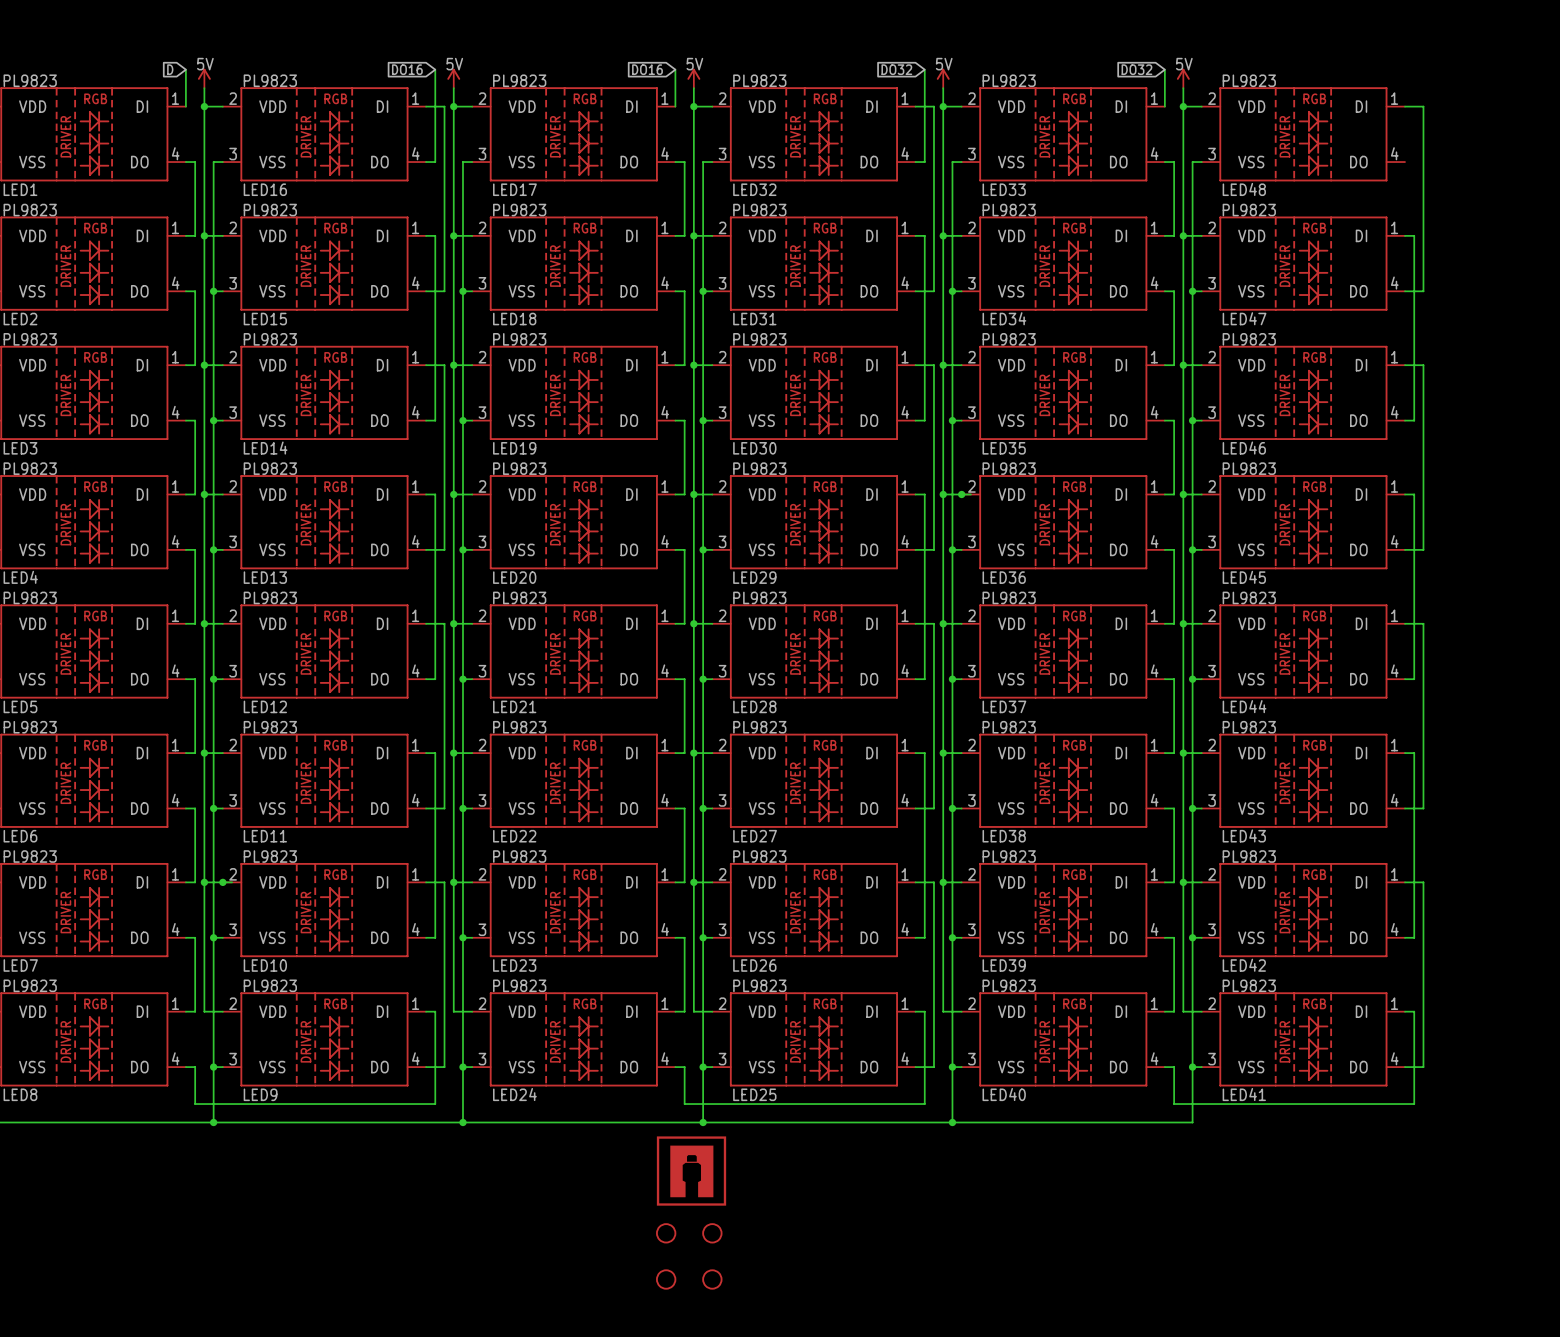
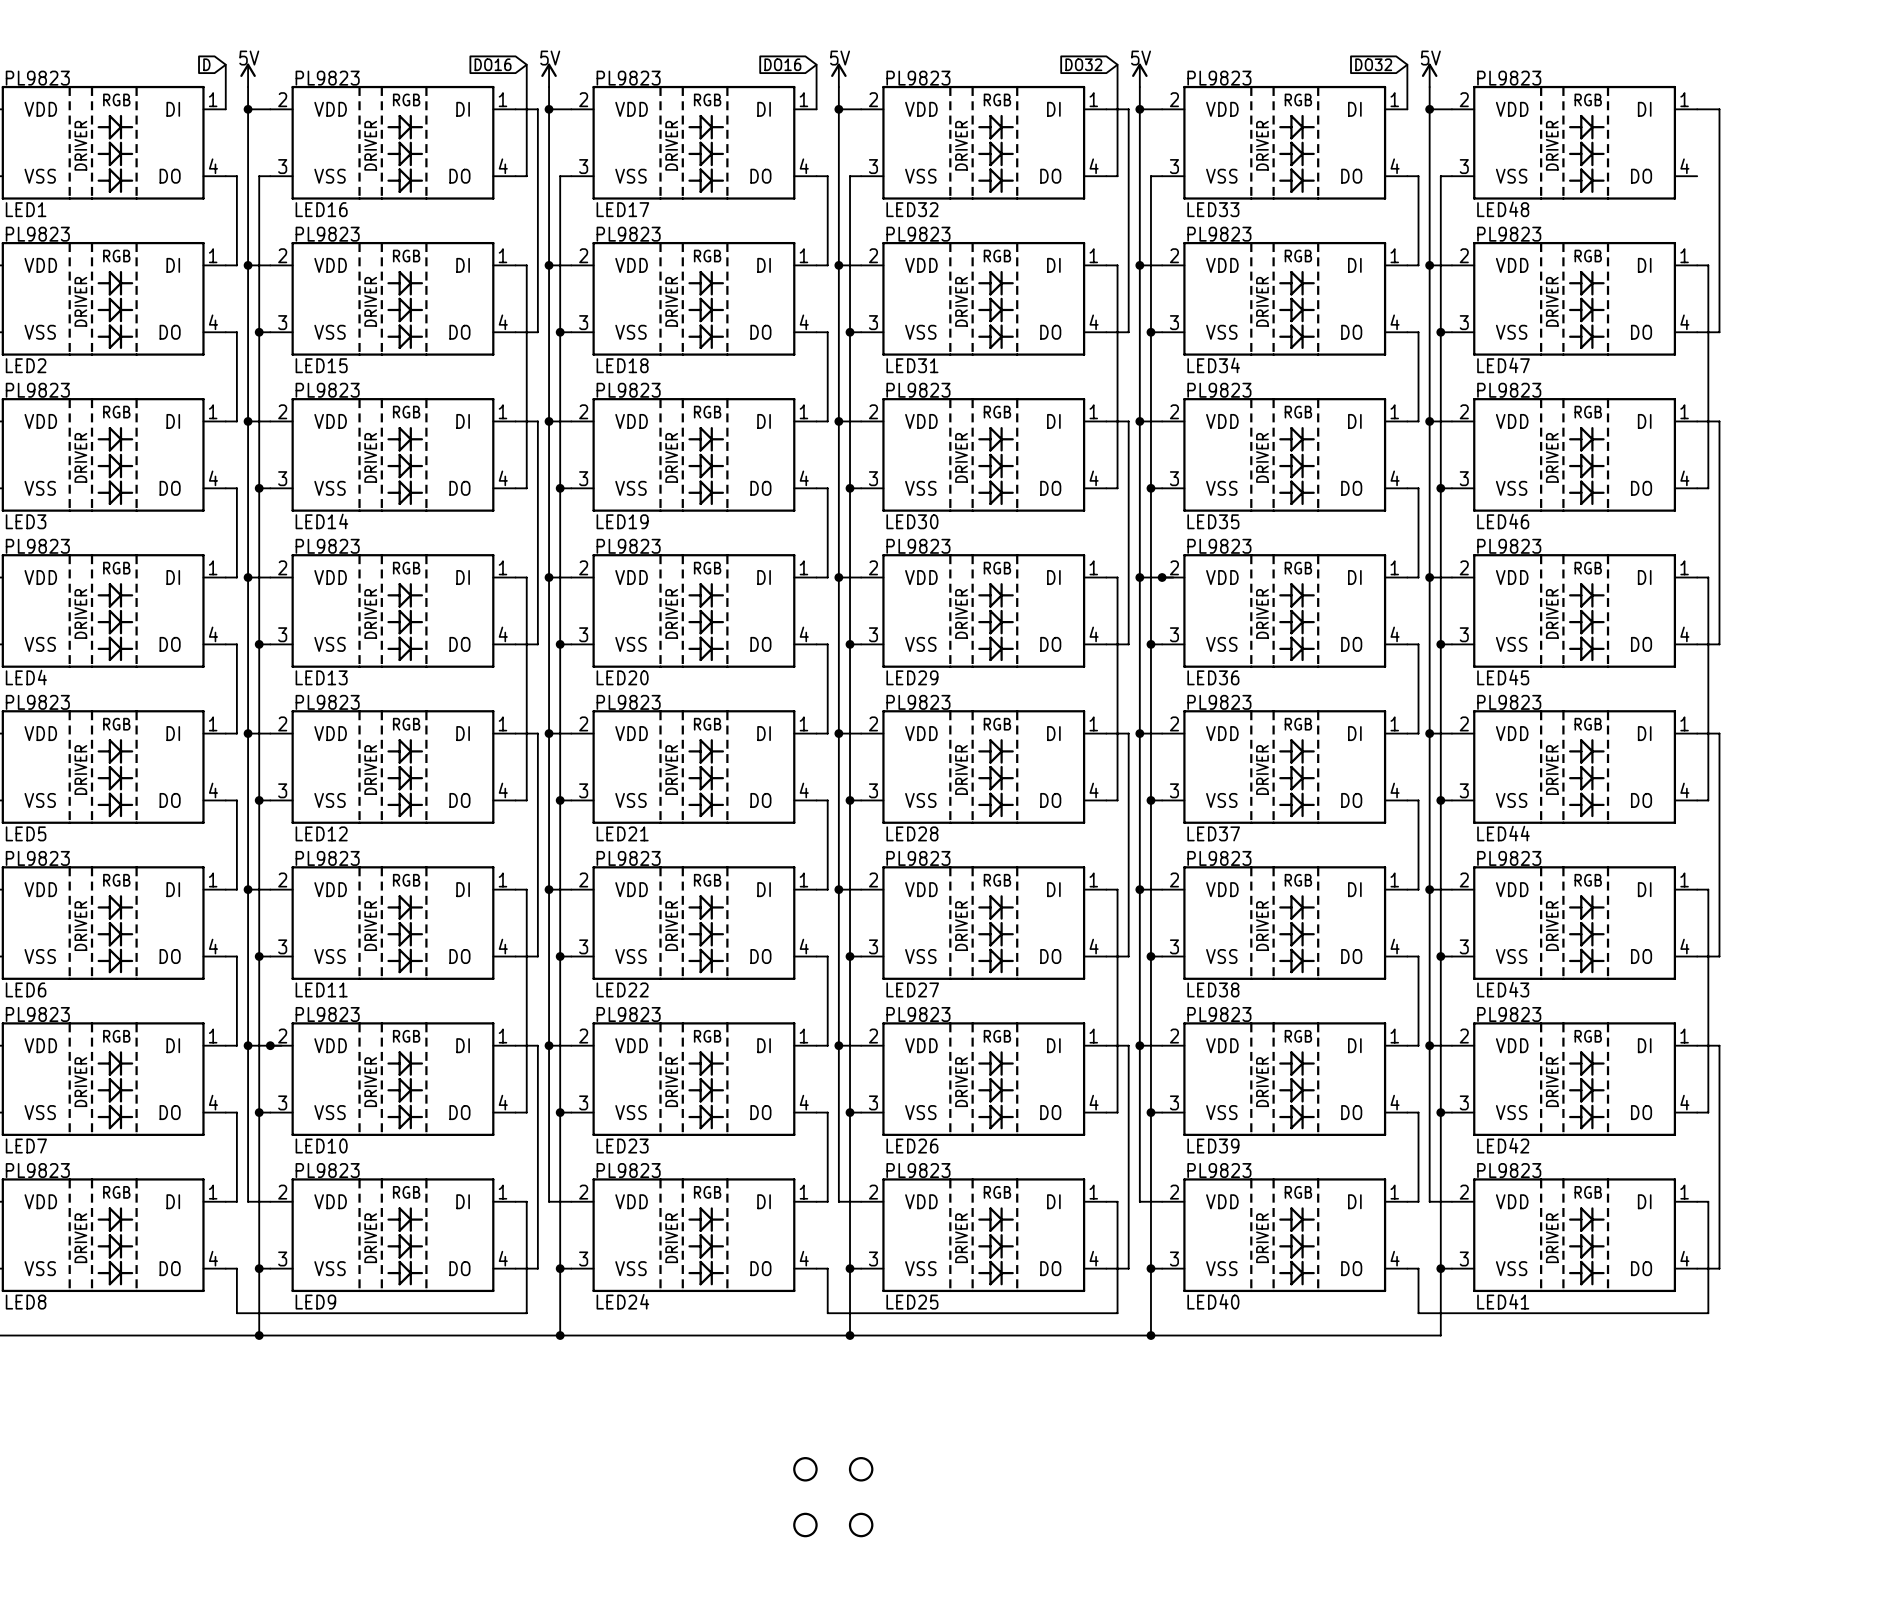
part: (691, 1171) -> none

